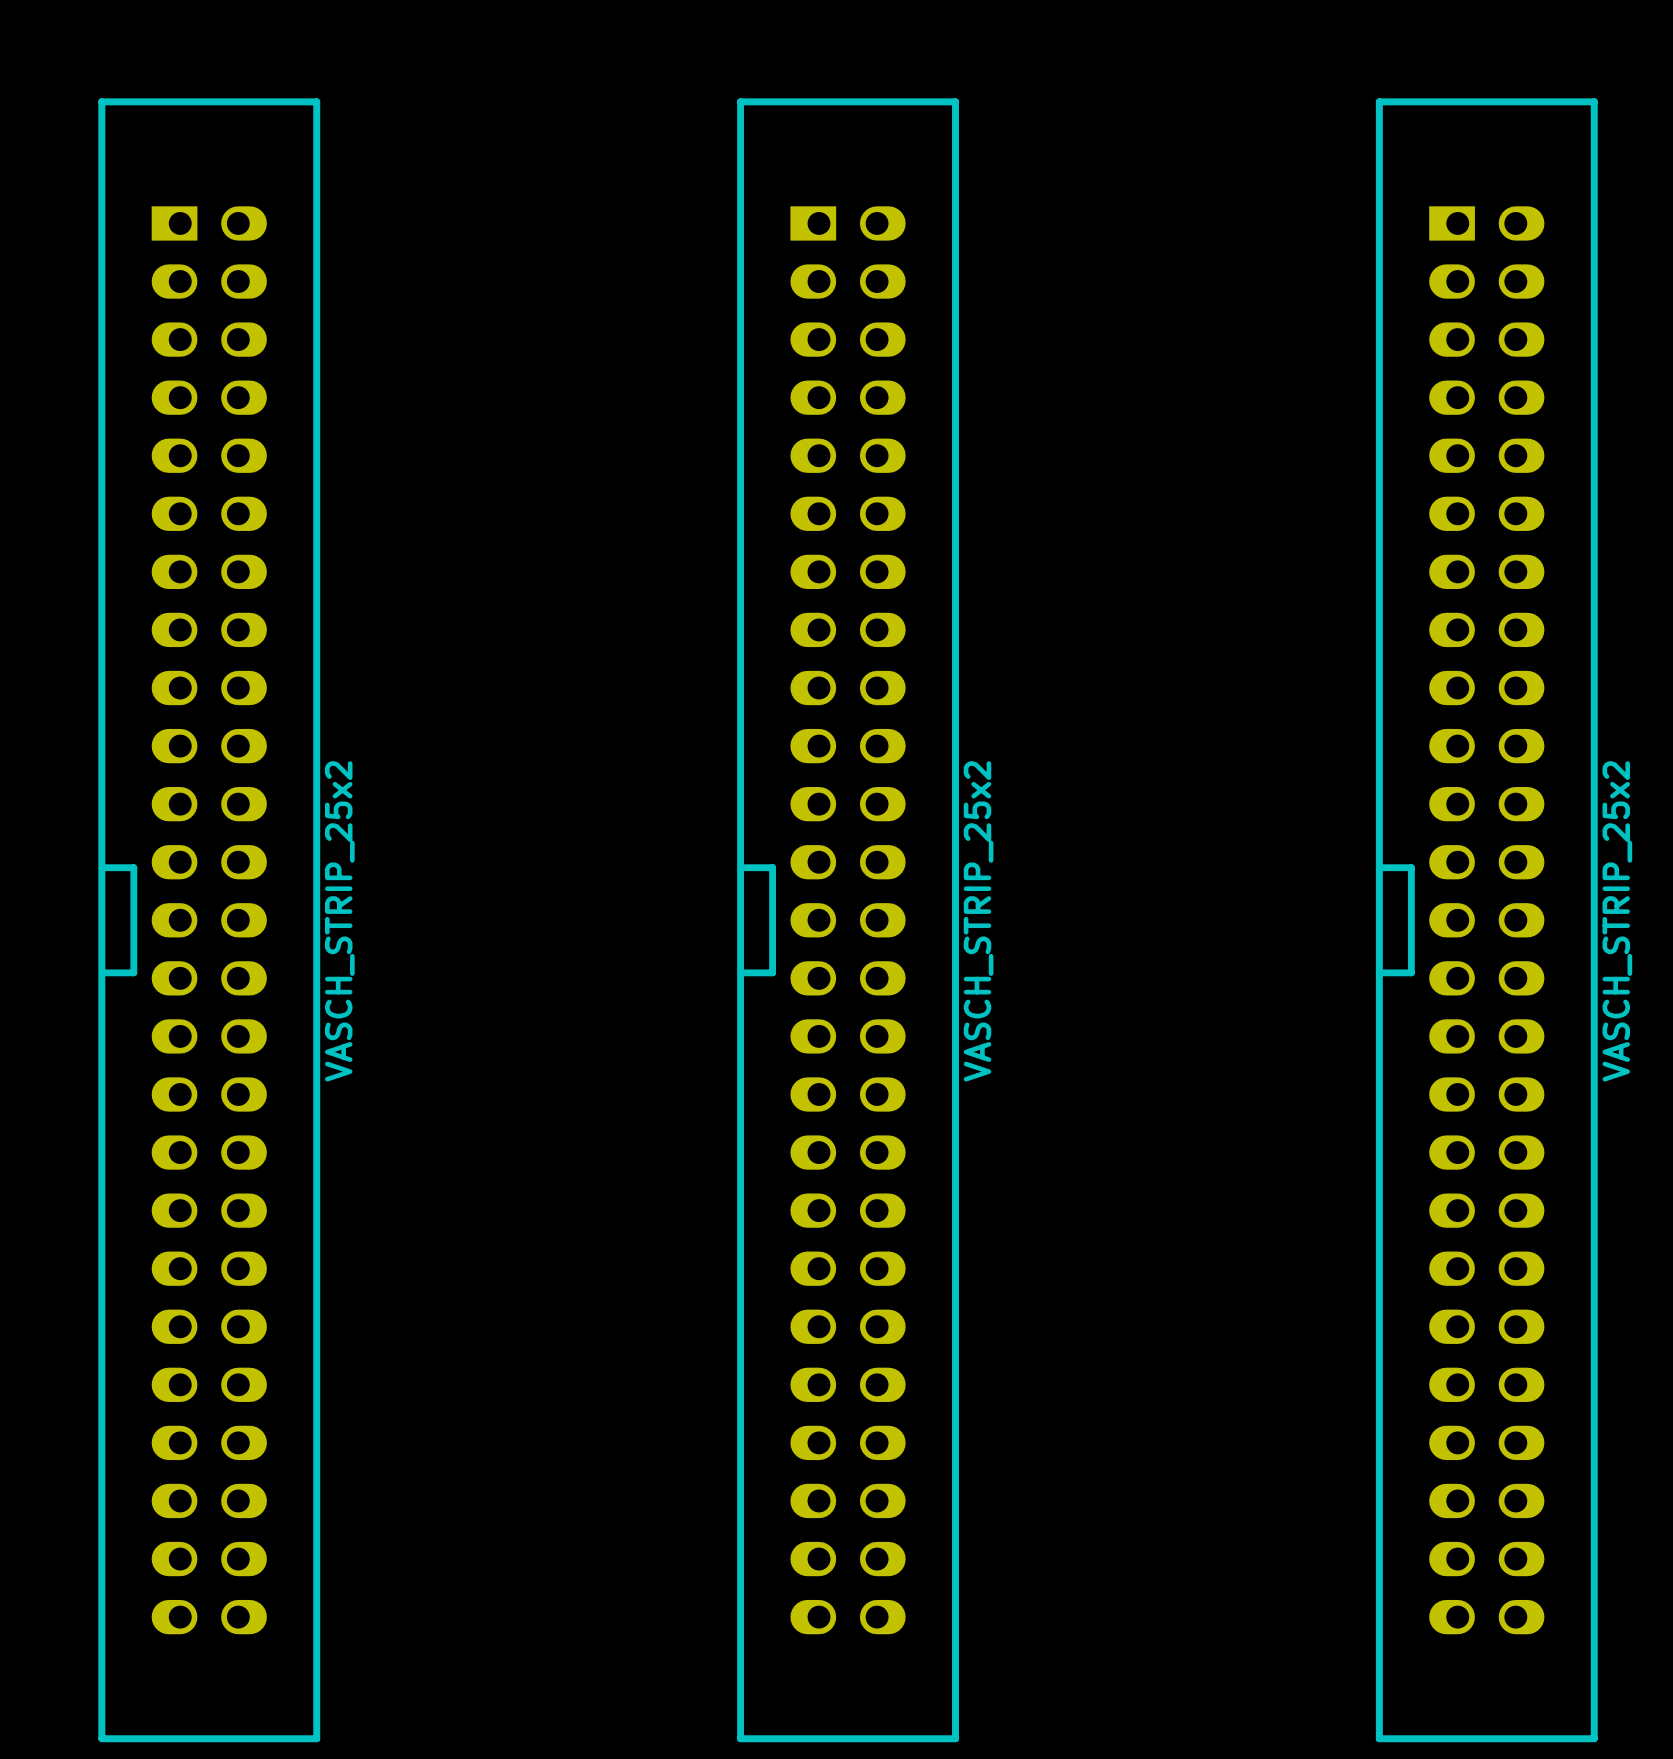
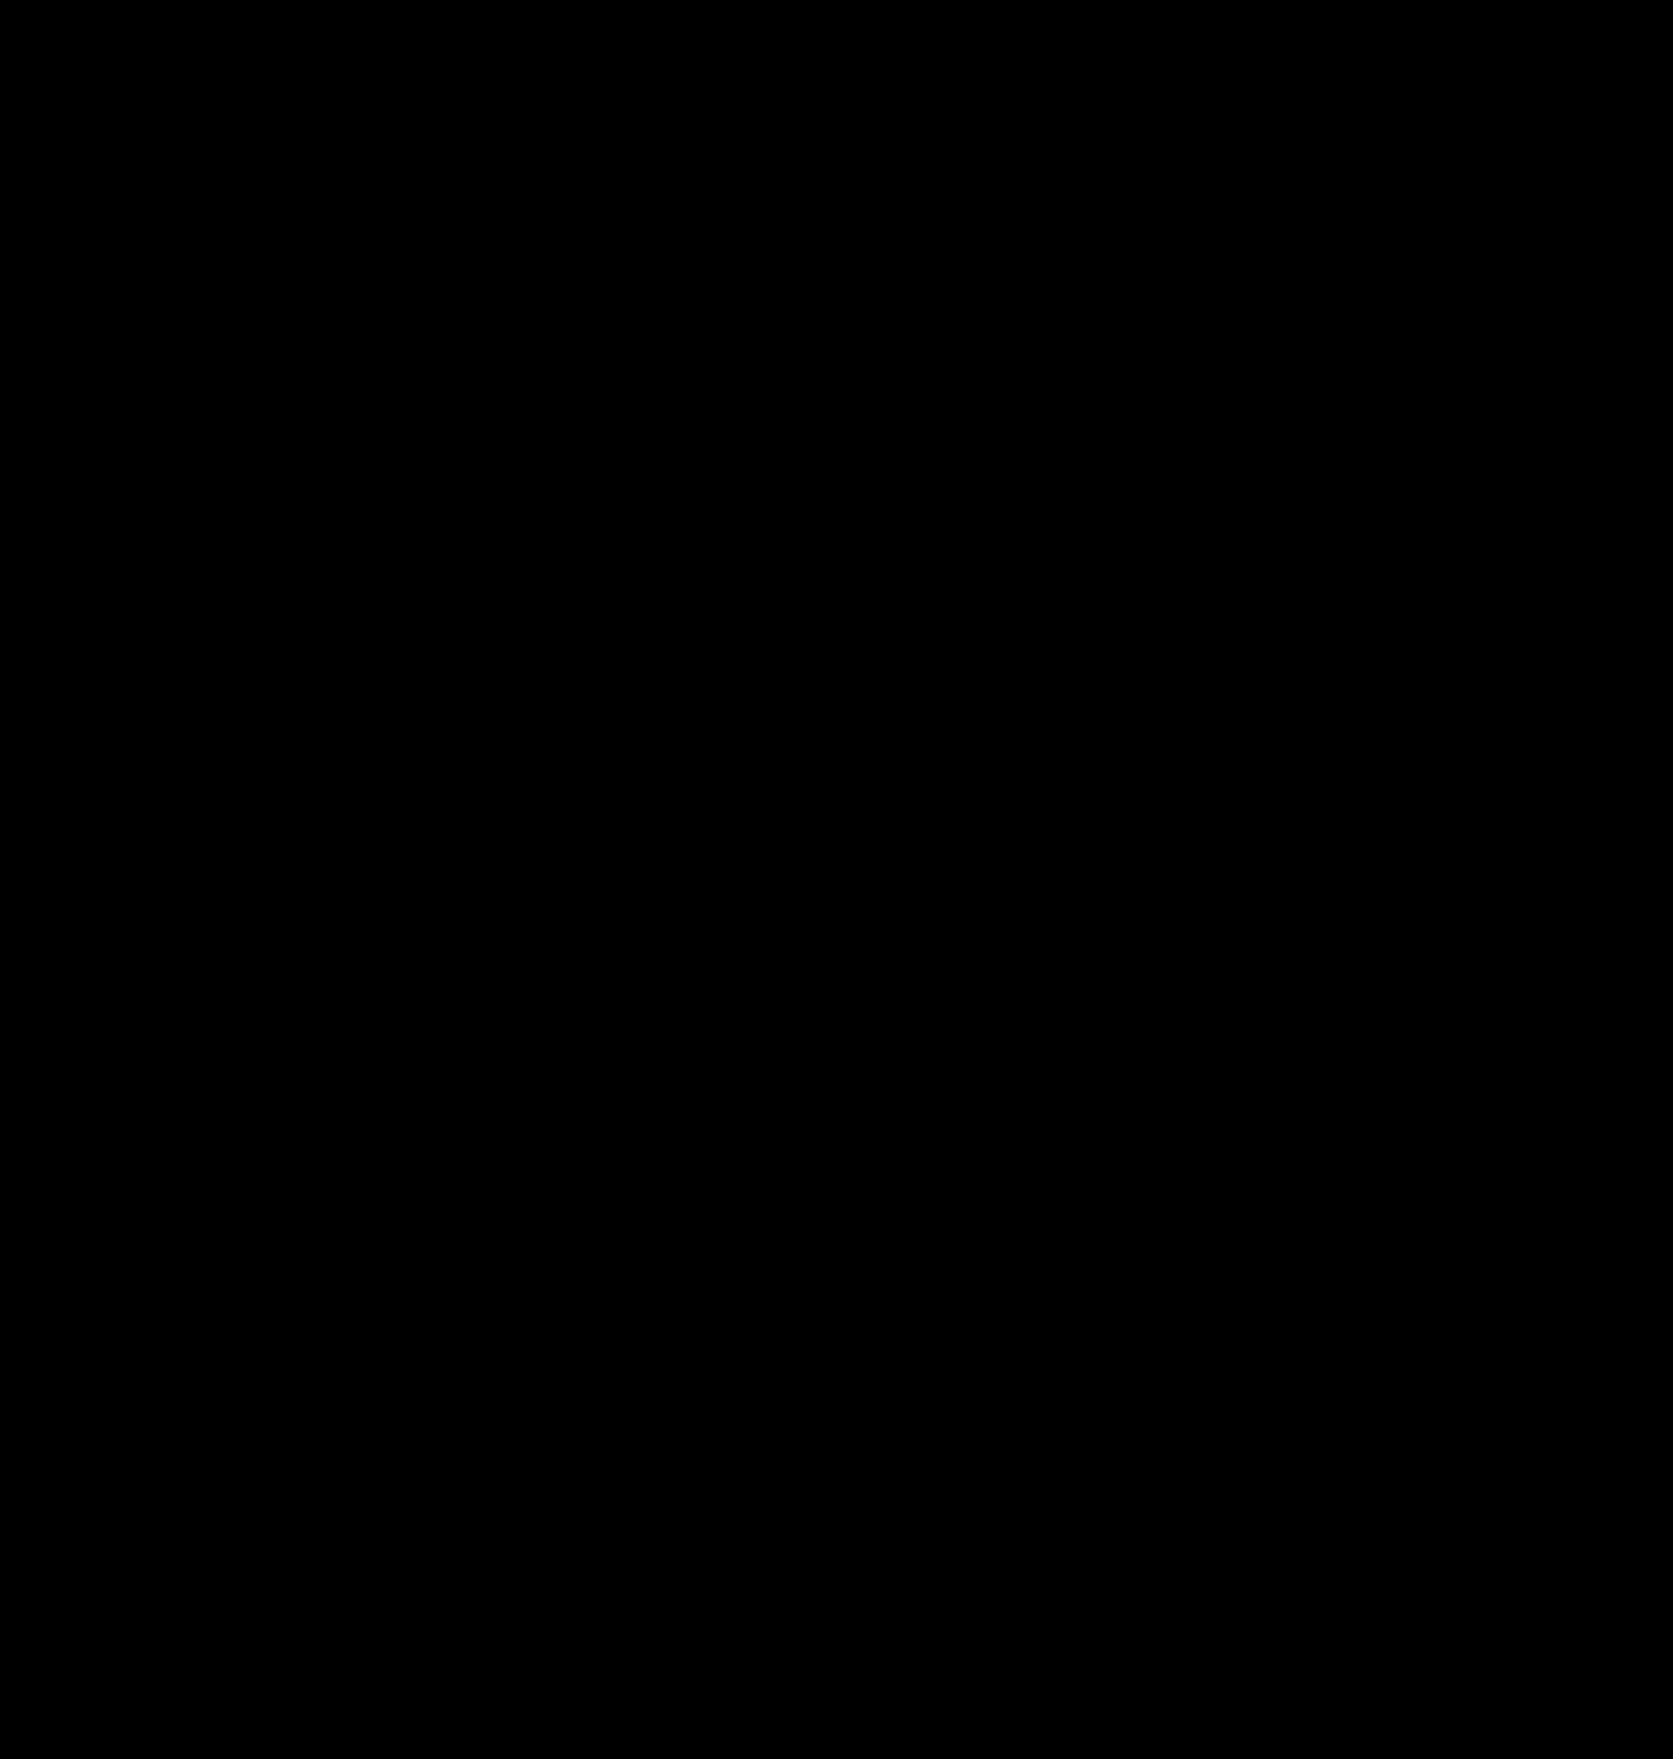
VASCH_STRIP_25x2: (209, 920) -> none
VASCH_STRIP_25x2: (848, 920) -> none
VASCH_STRIP_25x2: (1486, 920) -> none

